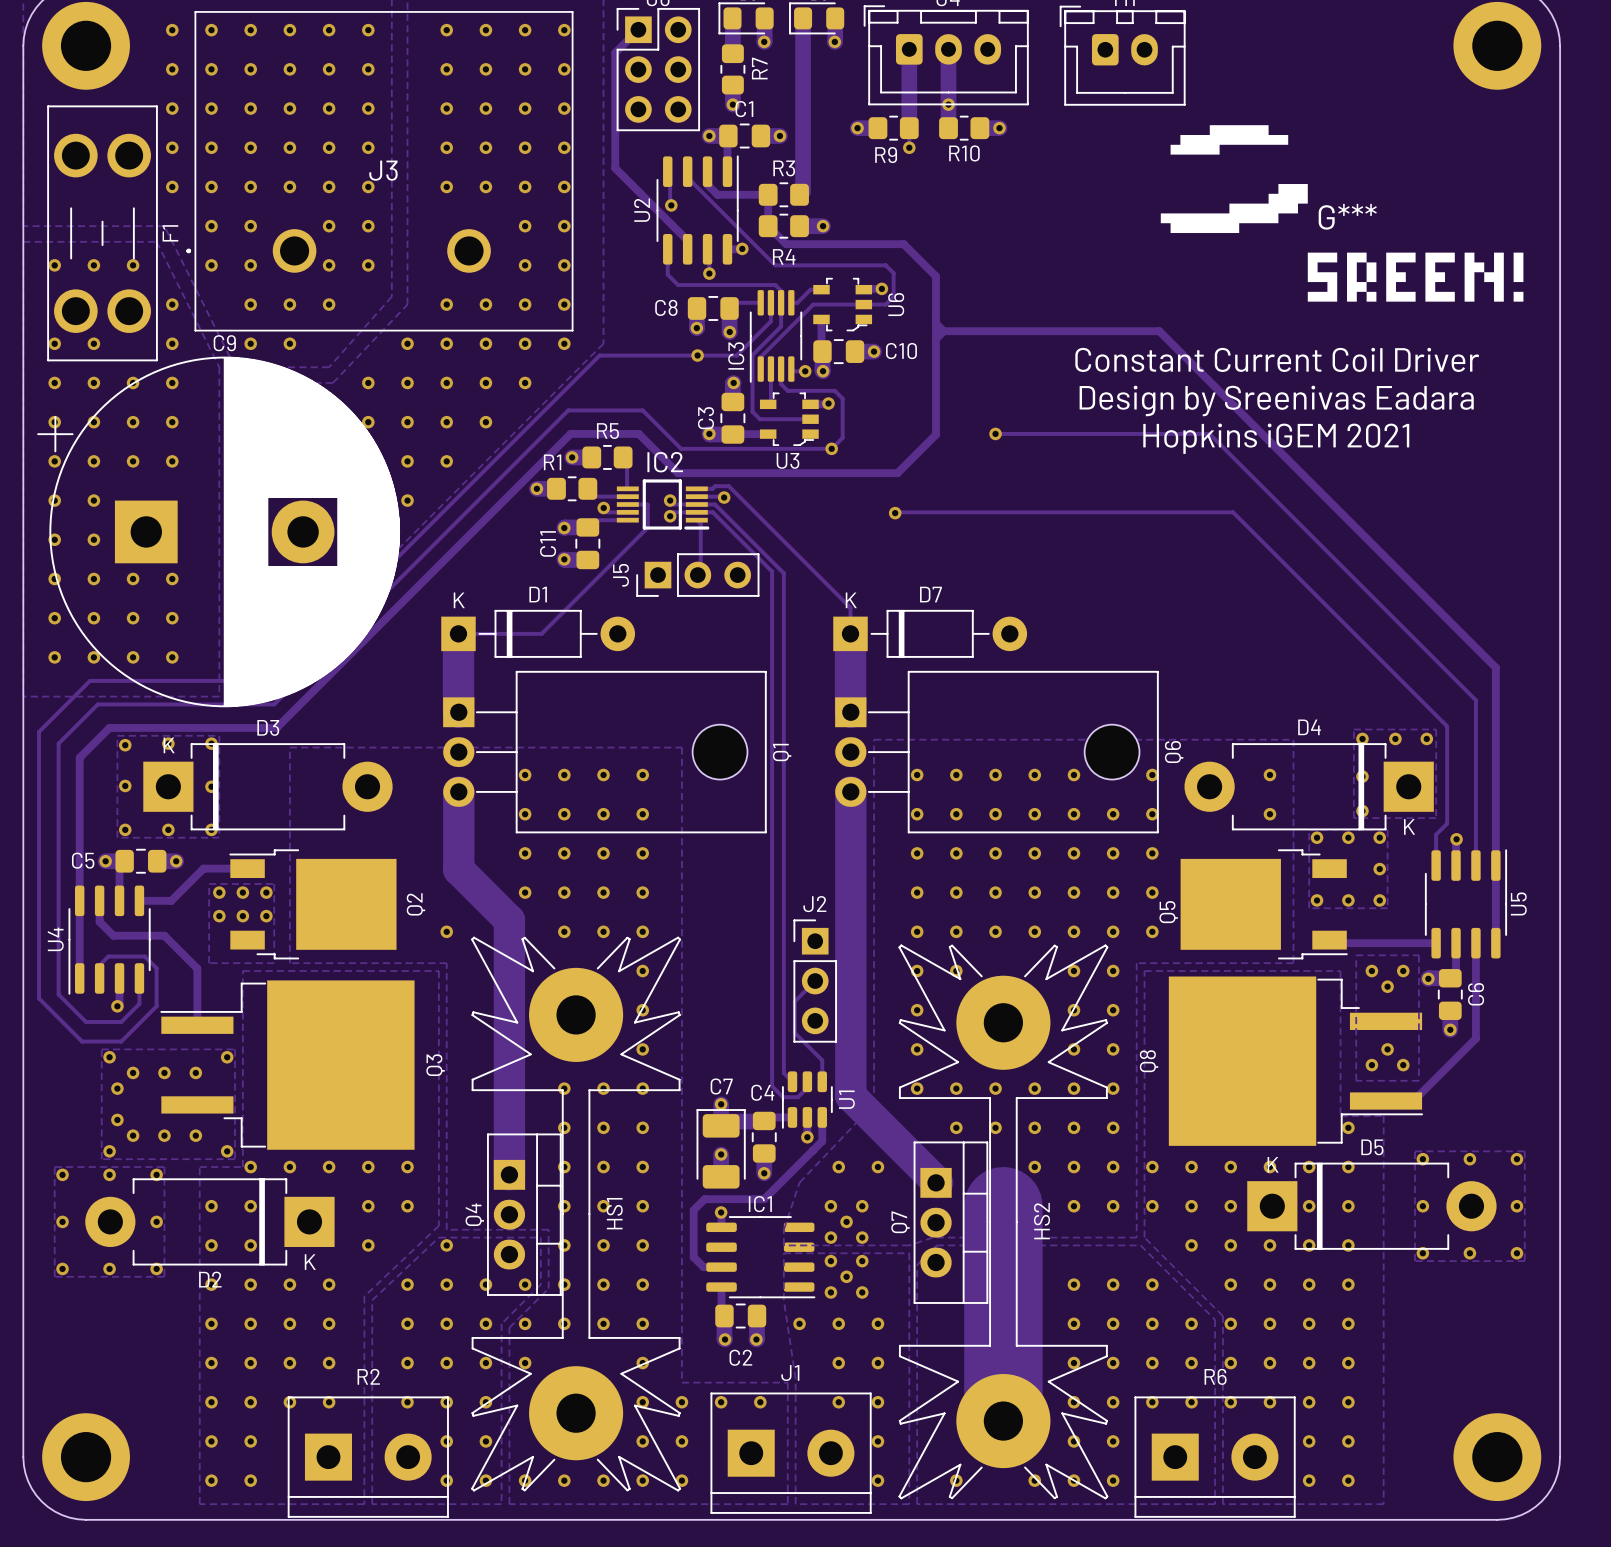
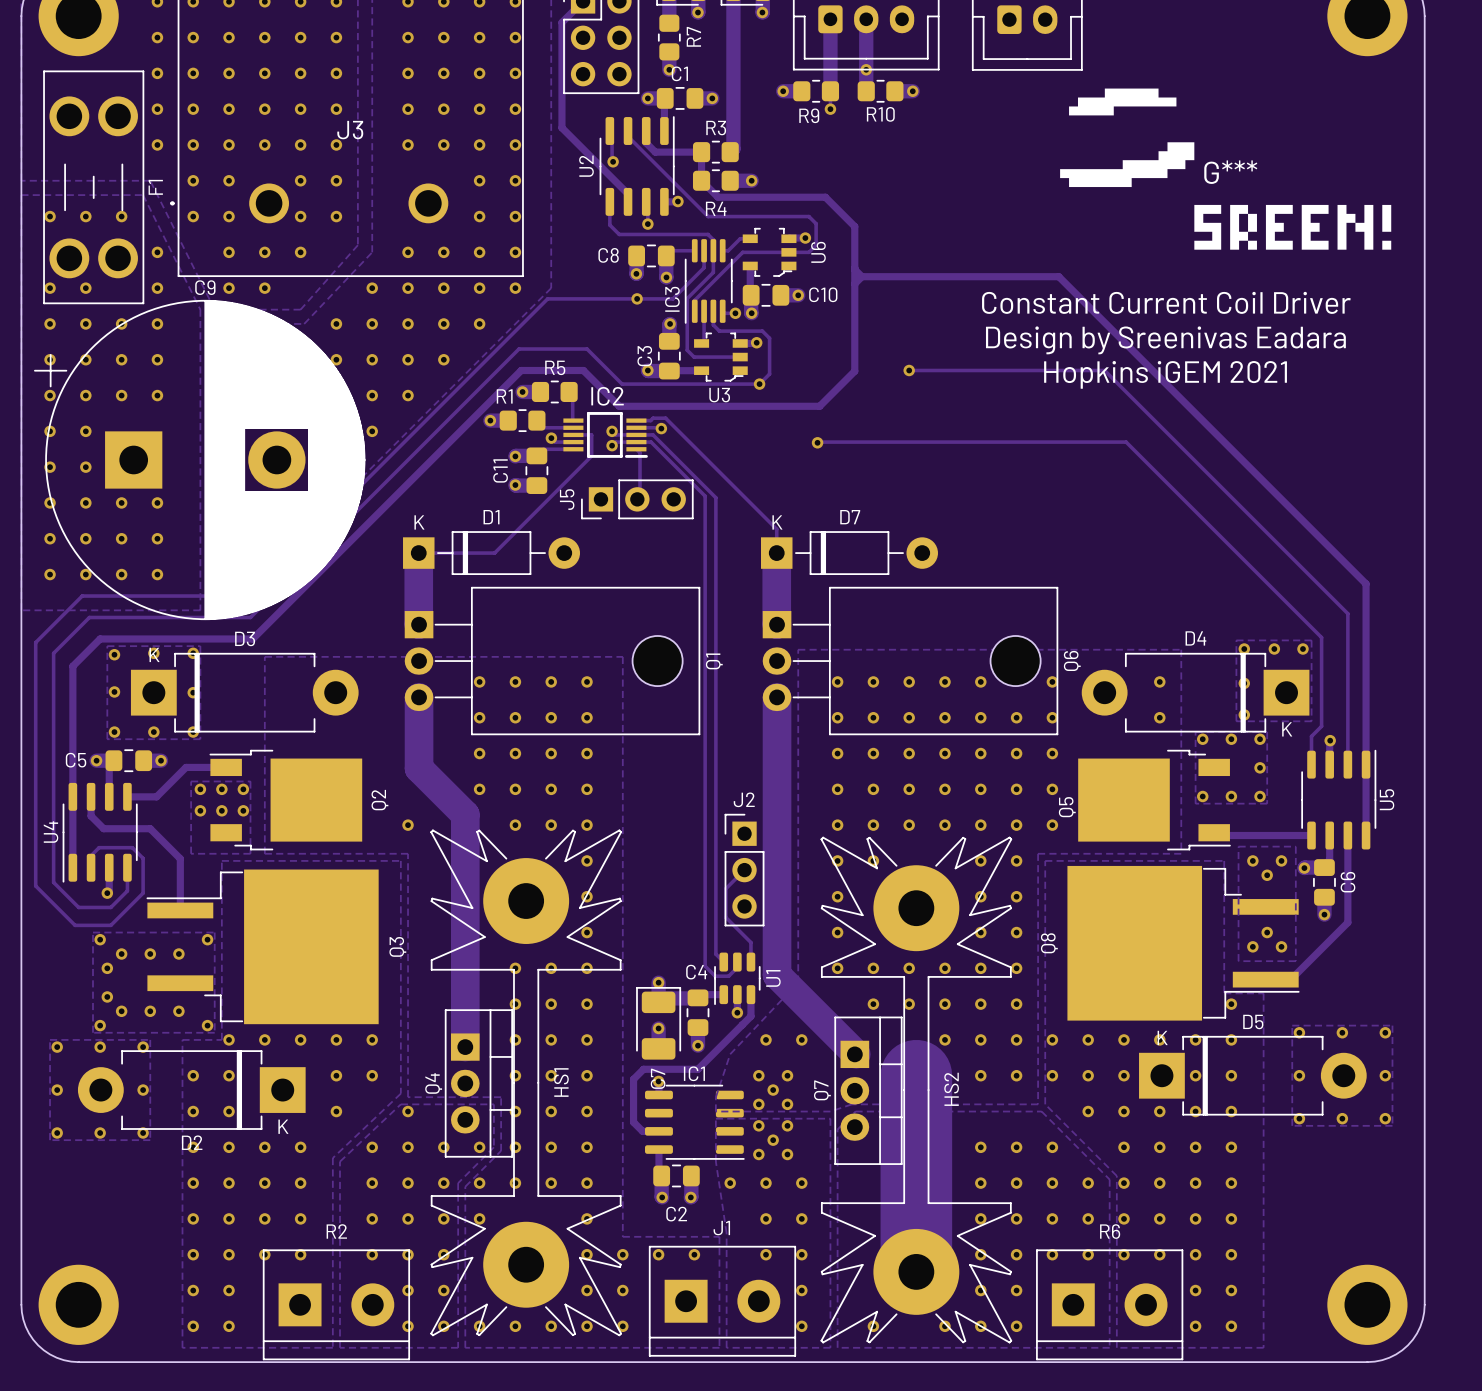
C7 name rotation: 0° (721, 1086) -> 90° counterclockwise (658, 1078)
C7 name position: C7 (721, 1086) -> C7 (658, 1078)

